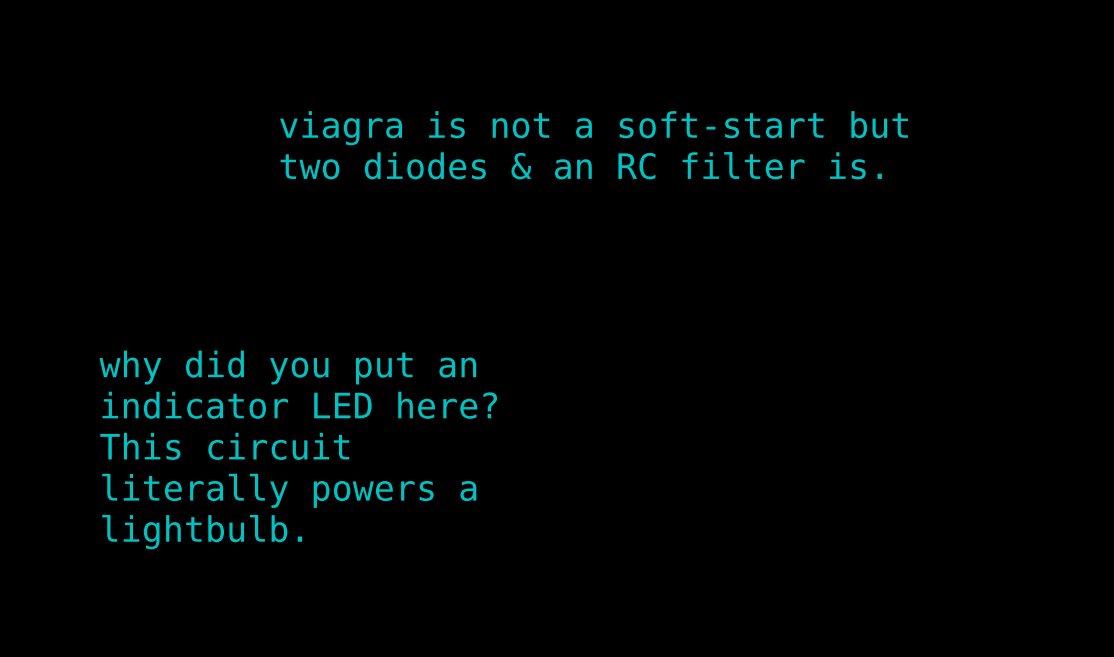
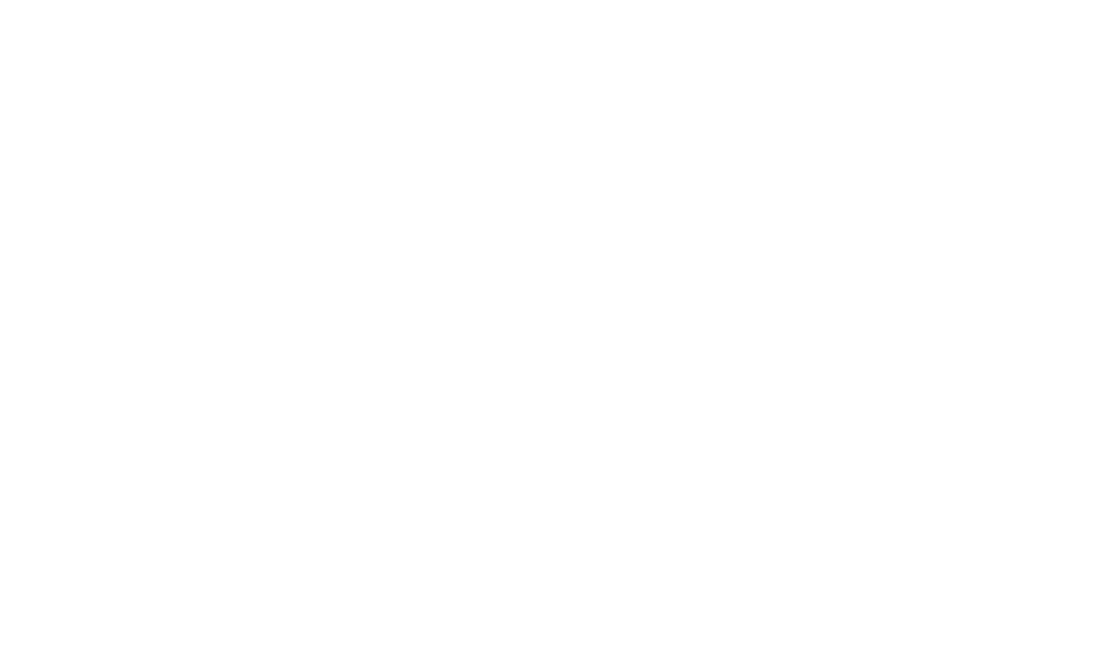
text: viagra is not a soft-start but (594, 128) -> none
text: two diodes & an RC filter is. (581, 165) -> none
text: why did you put an (287, 367) -> none
text: indicator LED here? (299, 405) -> none
text: This circuit (224, 446) -> none
text: literally powers a (289, 490) -> none
text: lightbulb. (202, 532) -> none

